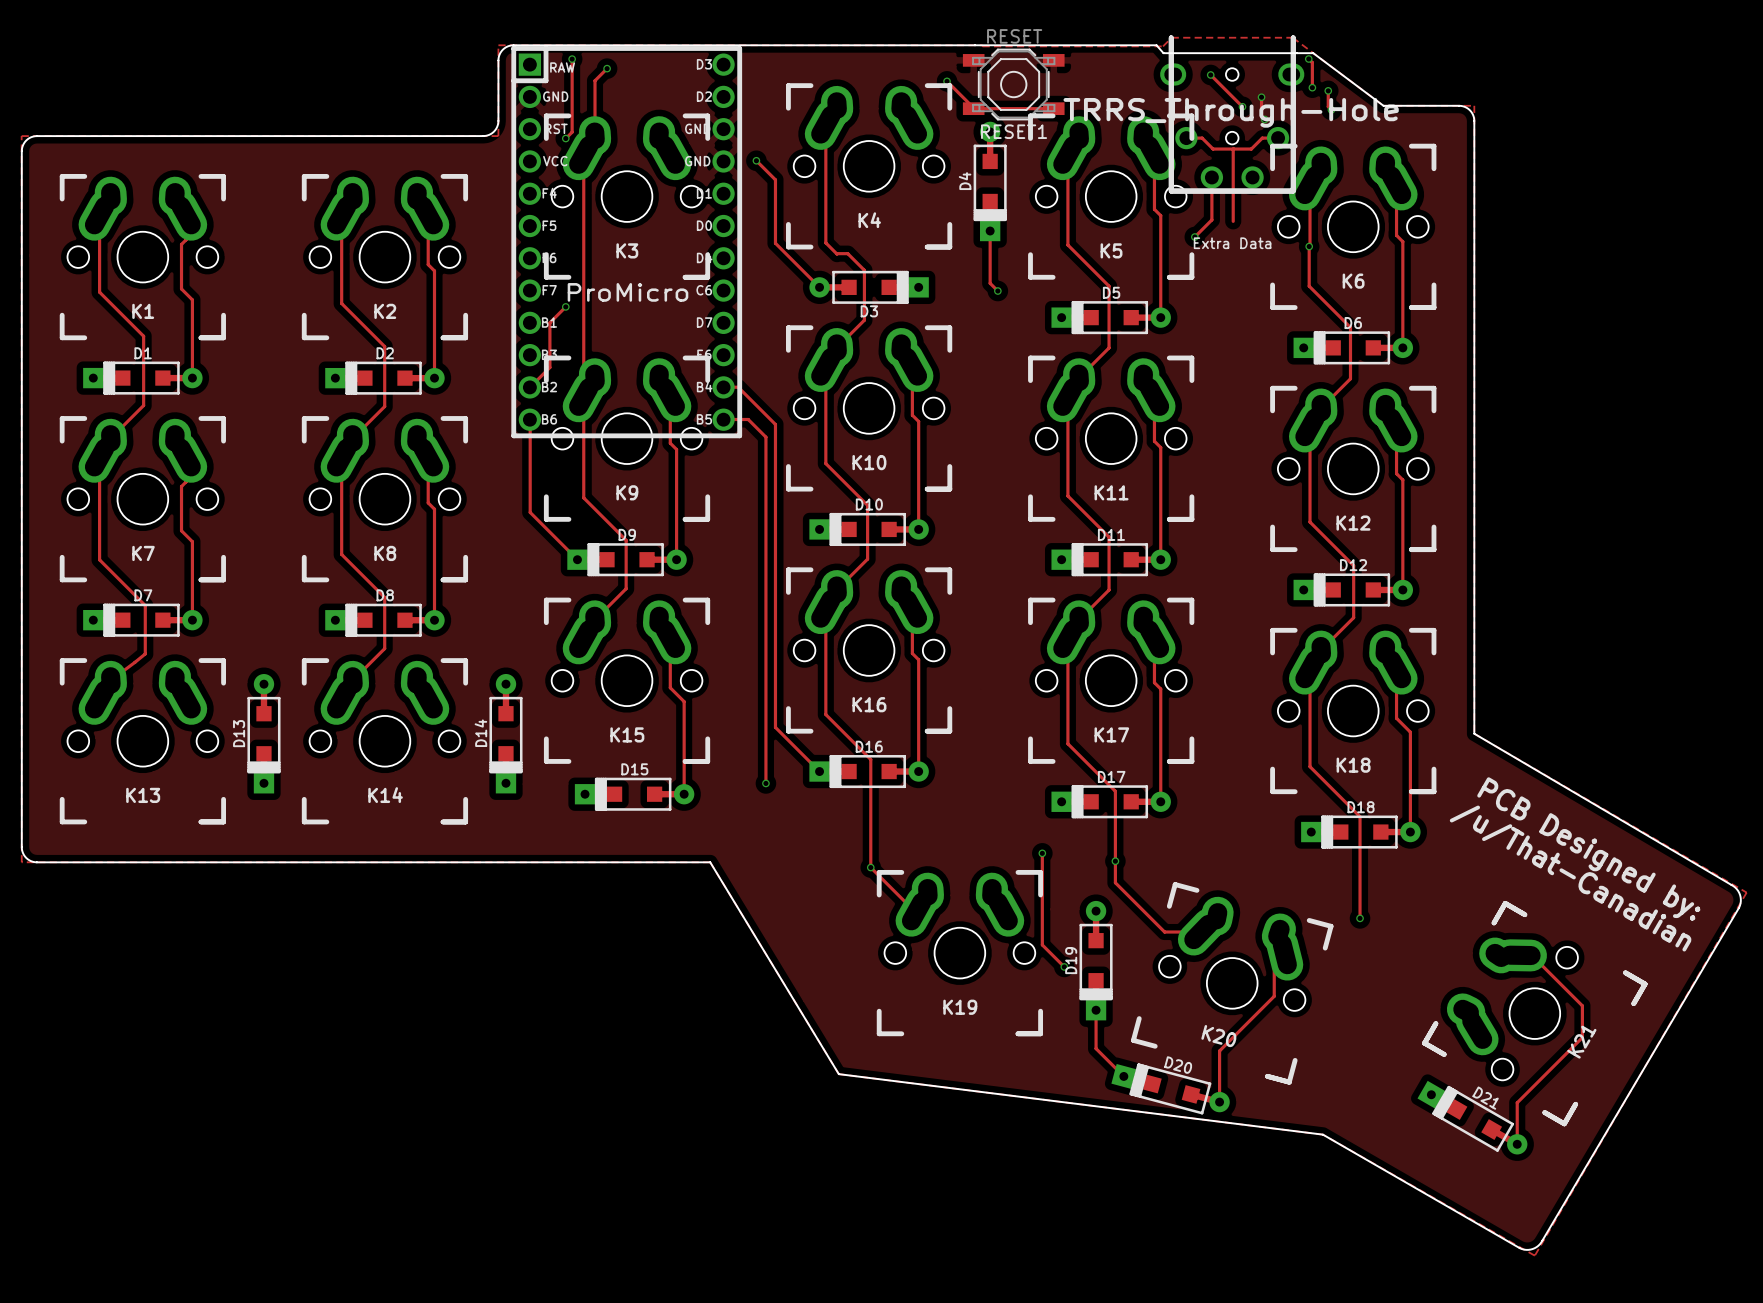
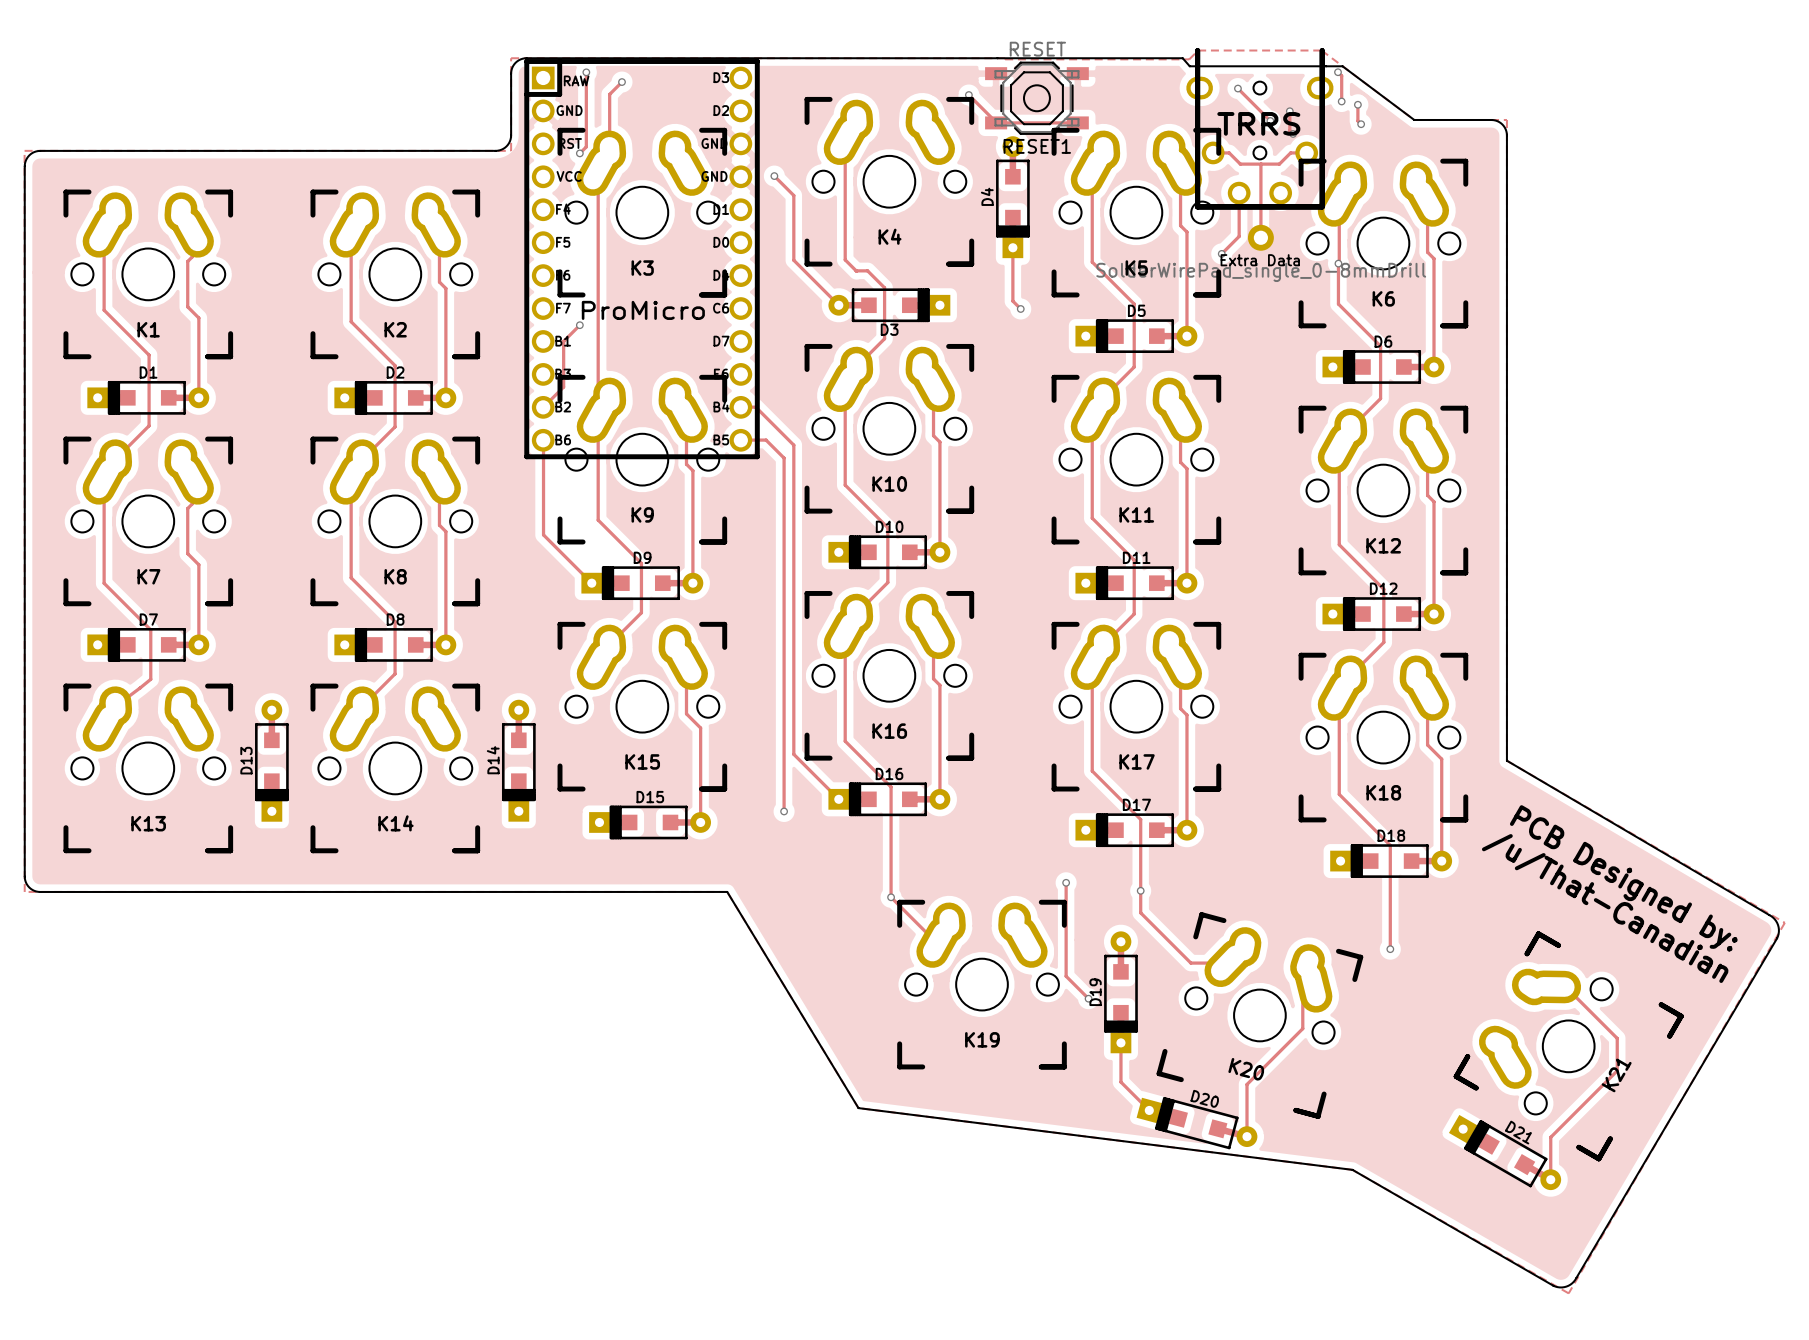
part value: TRRS_Through-Hole (1231, 112) -> TRRS (1258, 123)
part: none -> SolderWirePad_single_0-8mmDrill (1260, 237)

